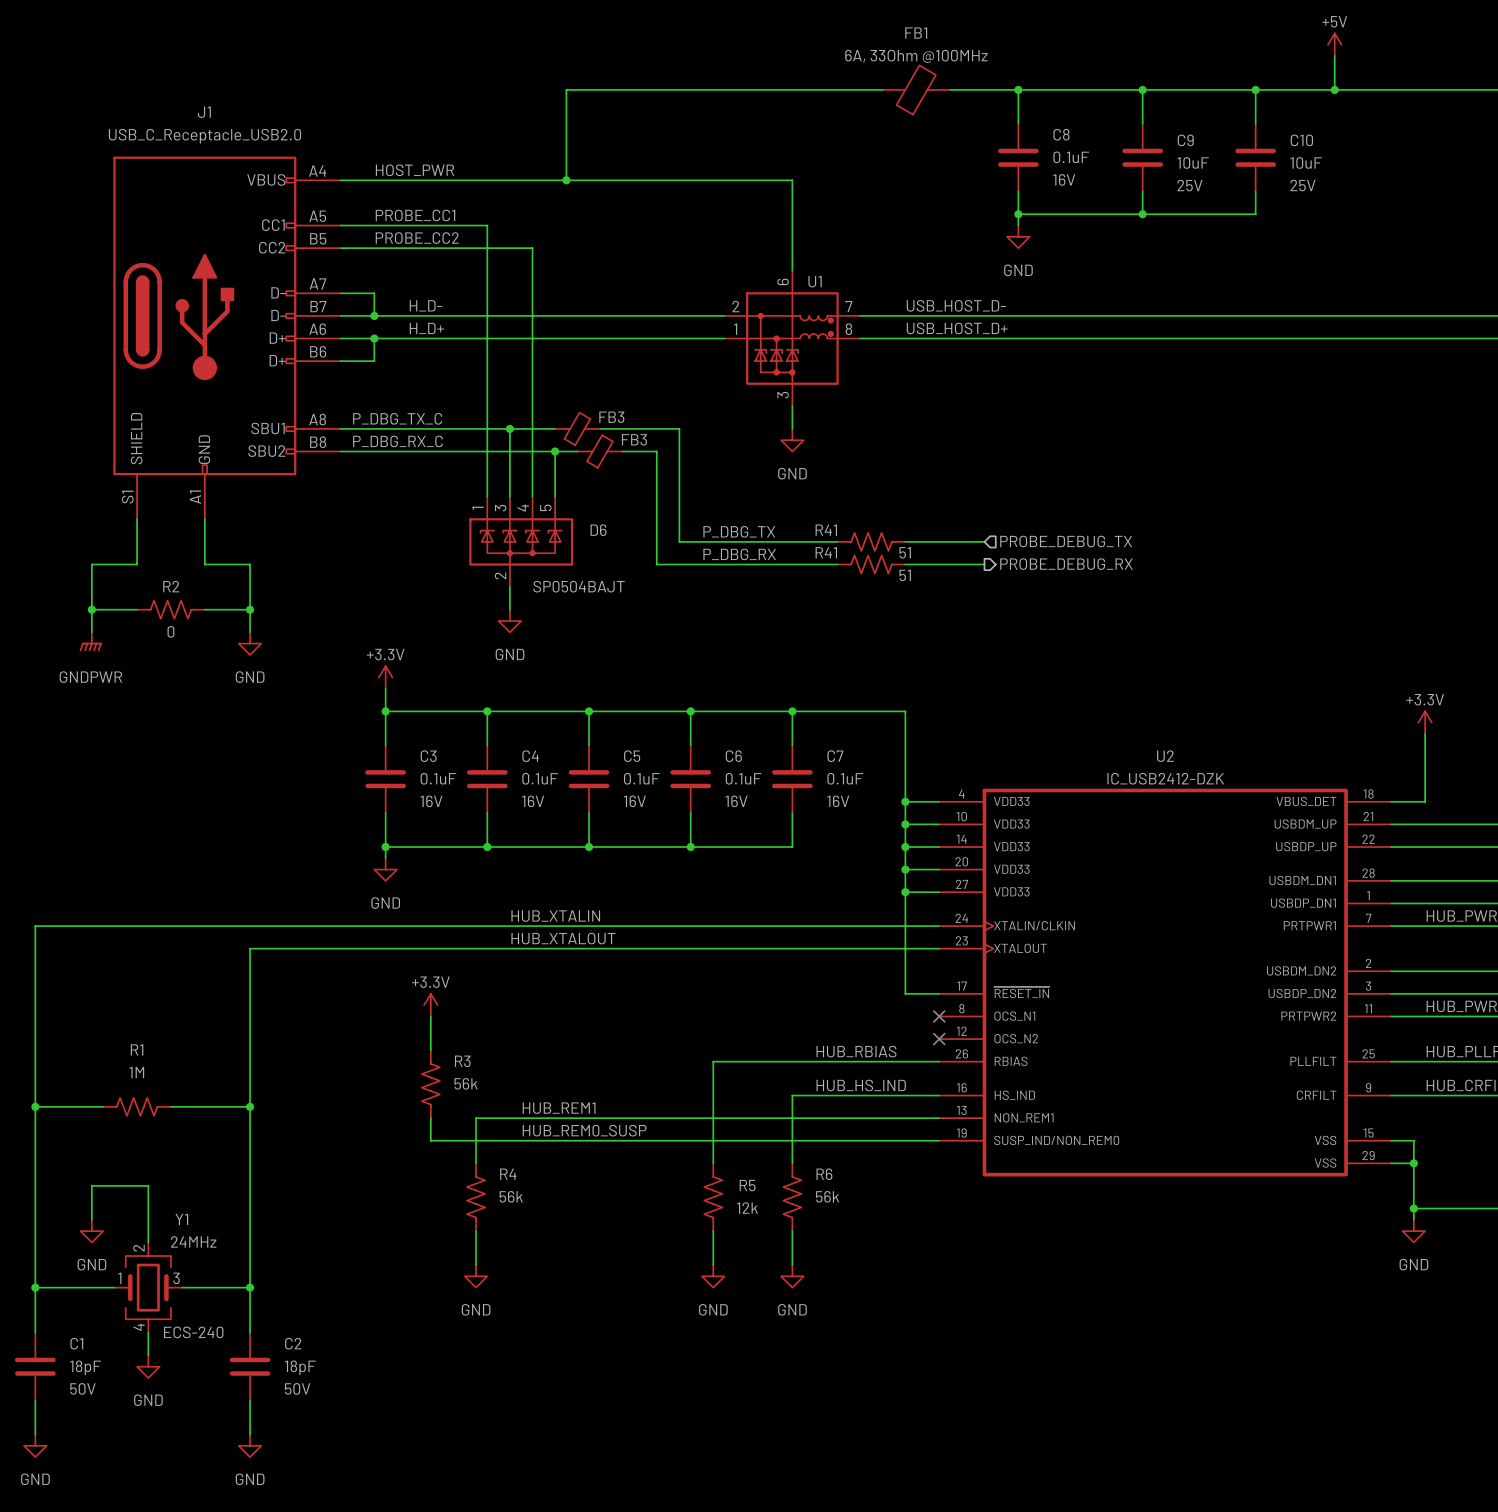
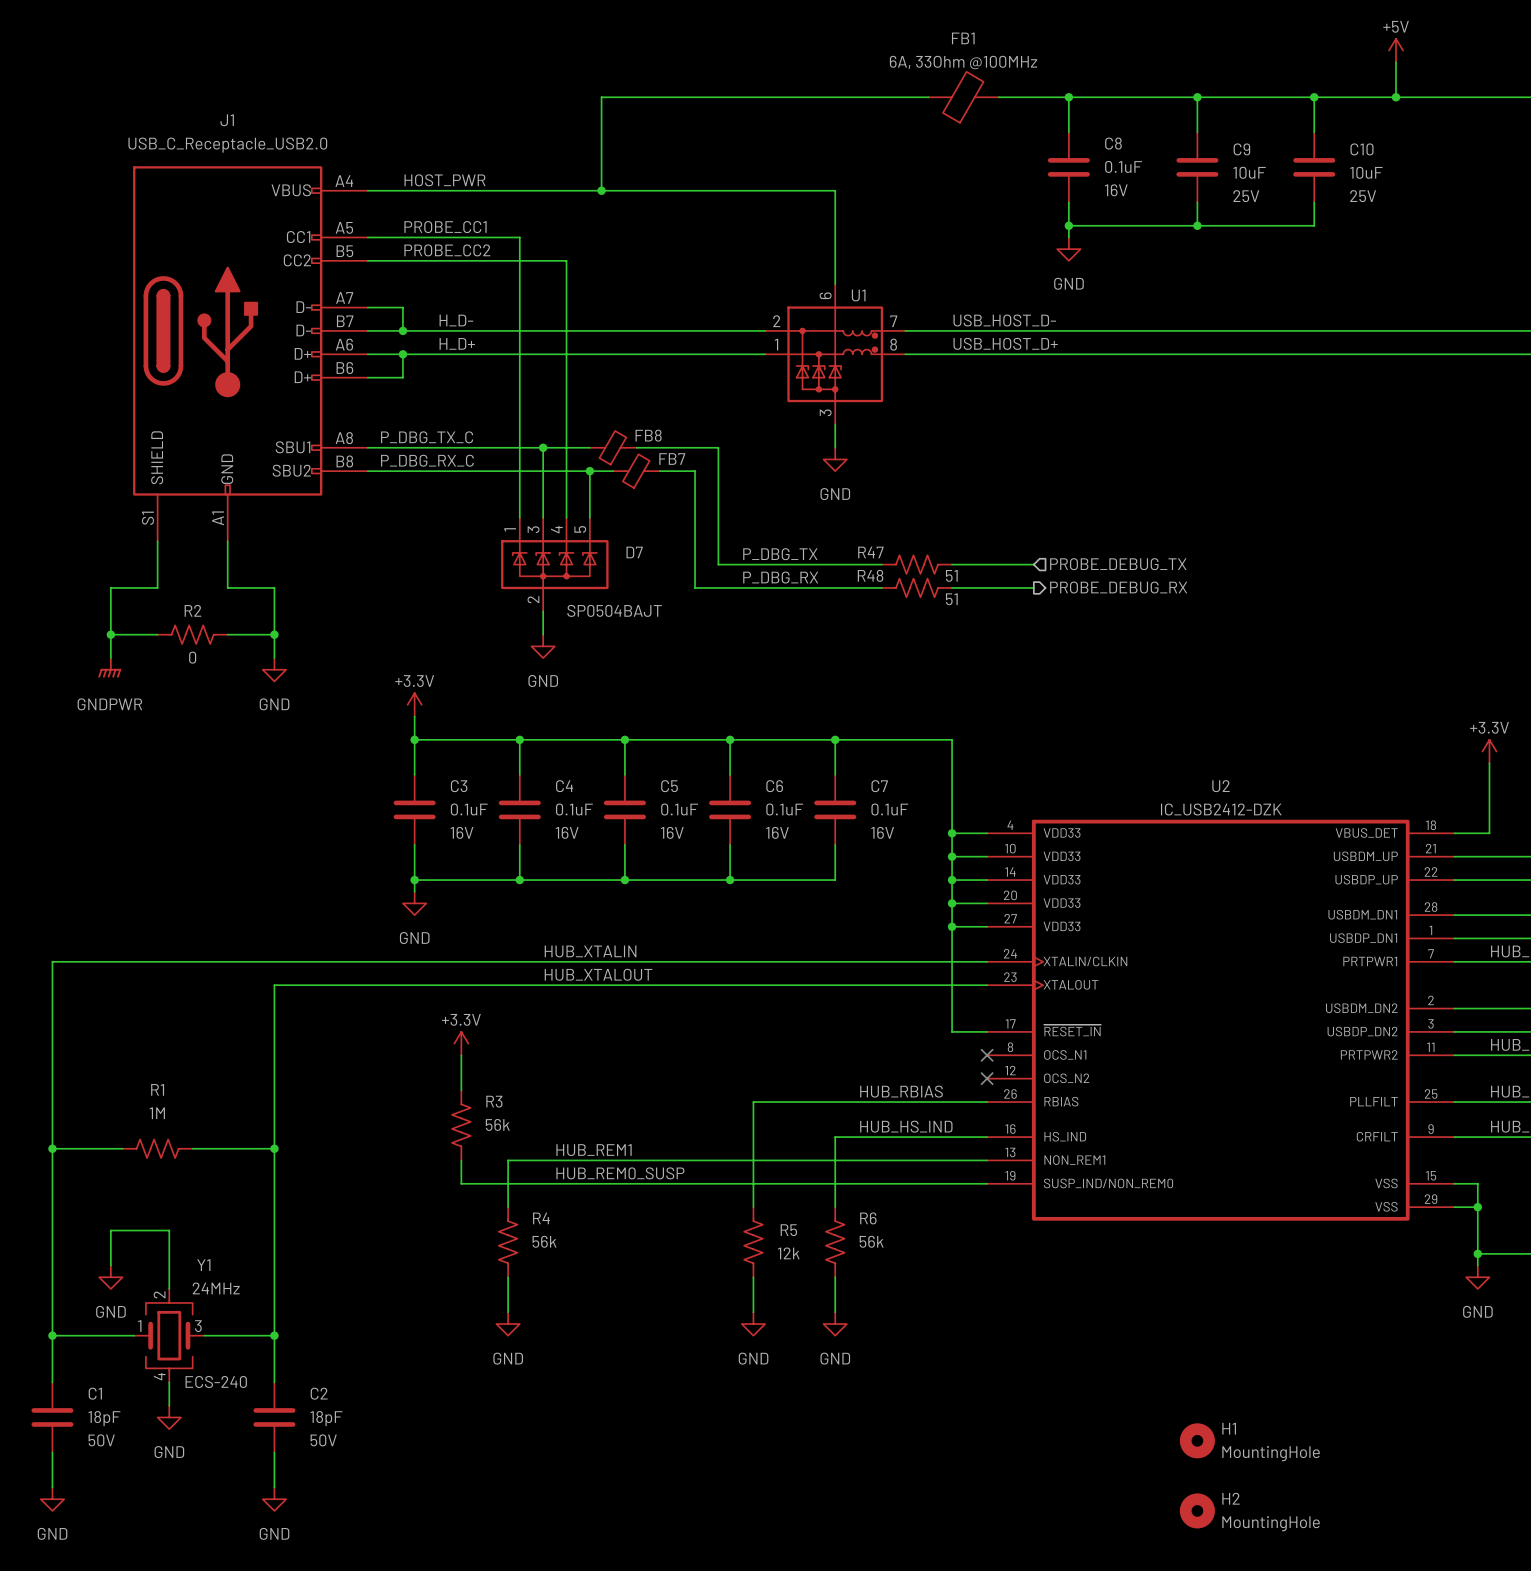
FB3 name: FB3 (611, 417) -> FB8 (648, 435)
FB3 name: FB3 (634, 439) -> FB7 (672, 459)
D6 name: D6 (598, 530) -> D7 (634, 552)
R41 name: R41 (826, 530) -> R47 (870, 552)
R41 name: R41 (826, 552) -> R48 (870, 575)
H1: none -> MountingHole (1197, 1440)
H2: none -> MountingHole (1197, 1510)

